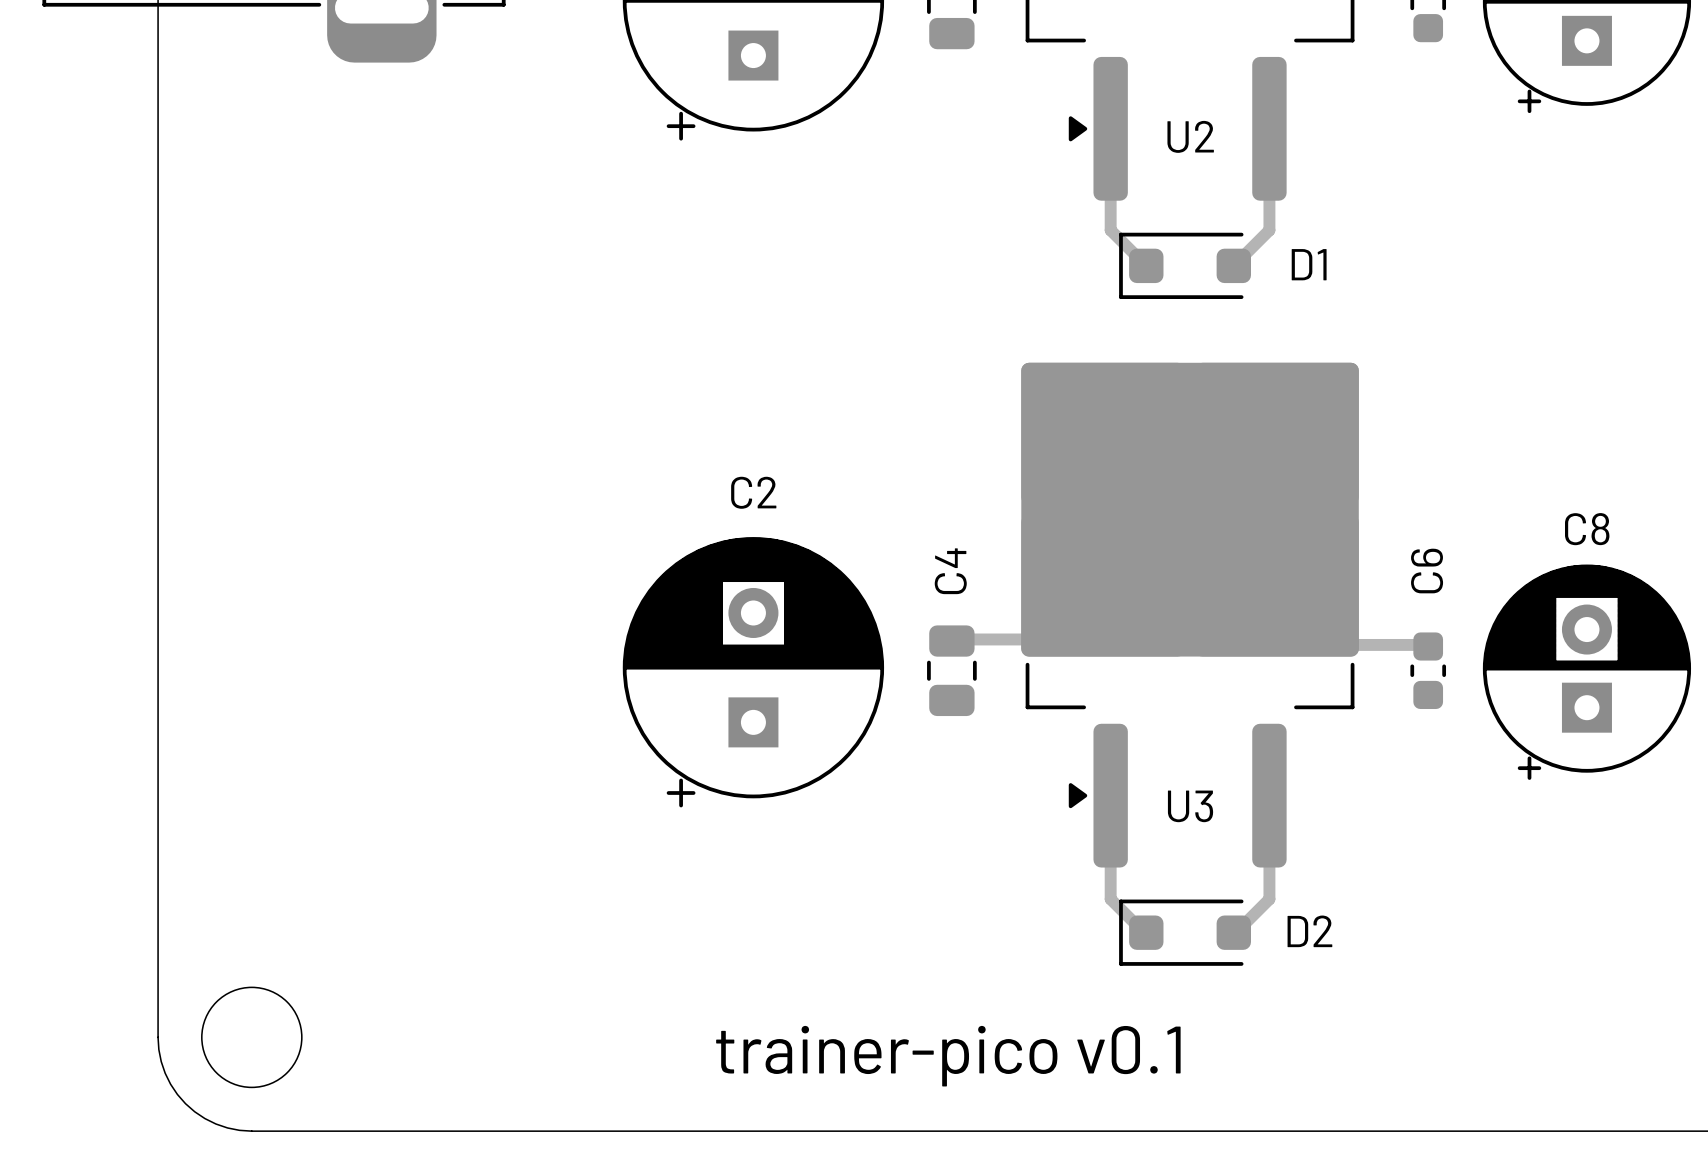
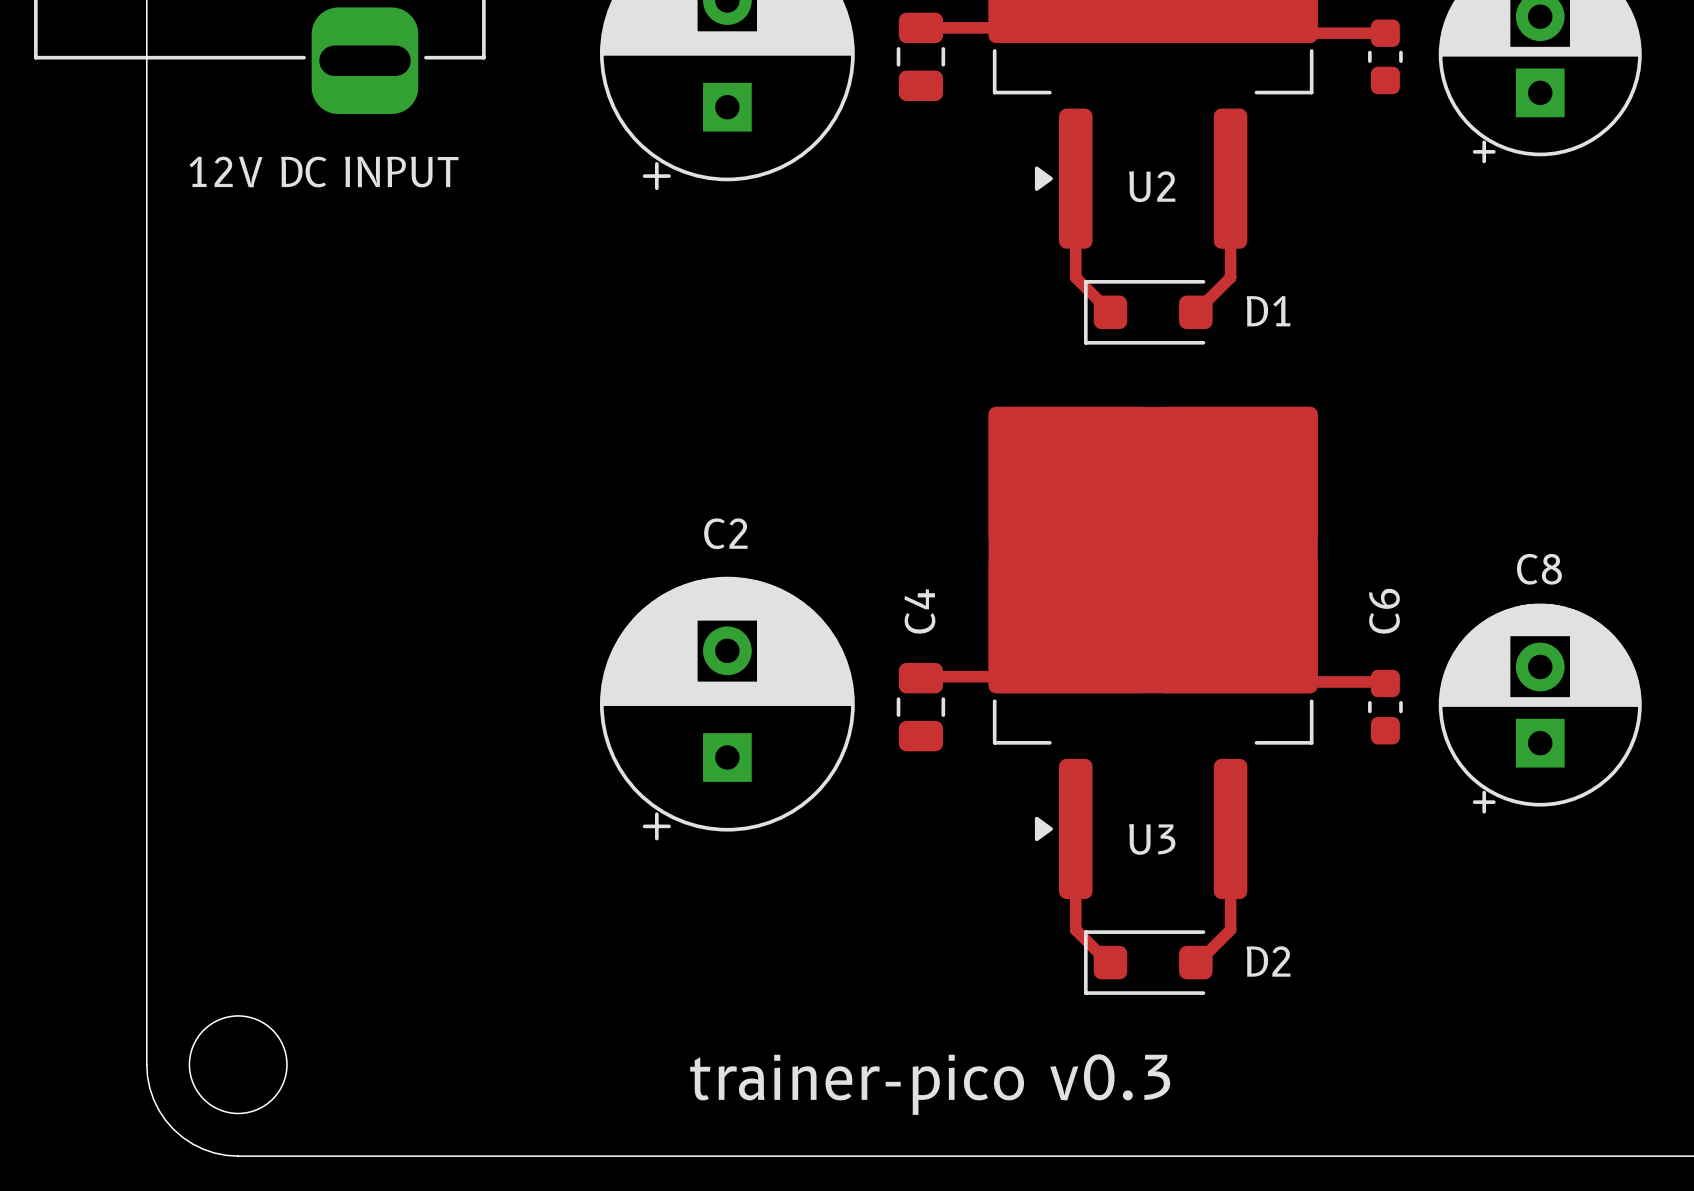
text: none -> 12V DC INPUT (323, 172)
text: trainer-pico v0.1 (948, 1056) -> trainer-pico v0.3 (930, 1084)

